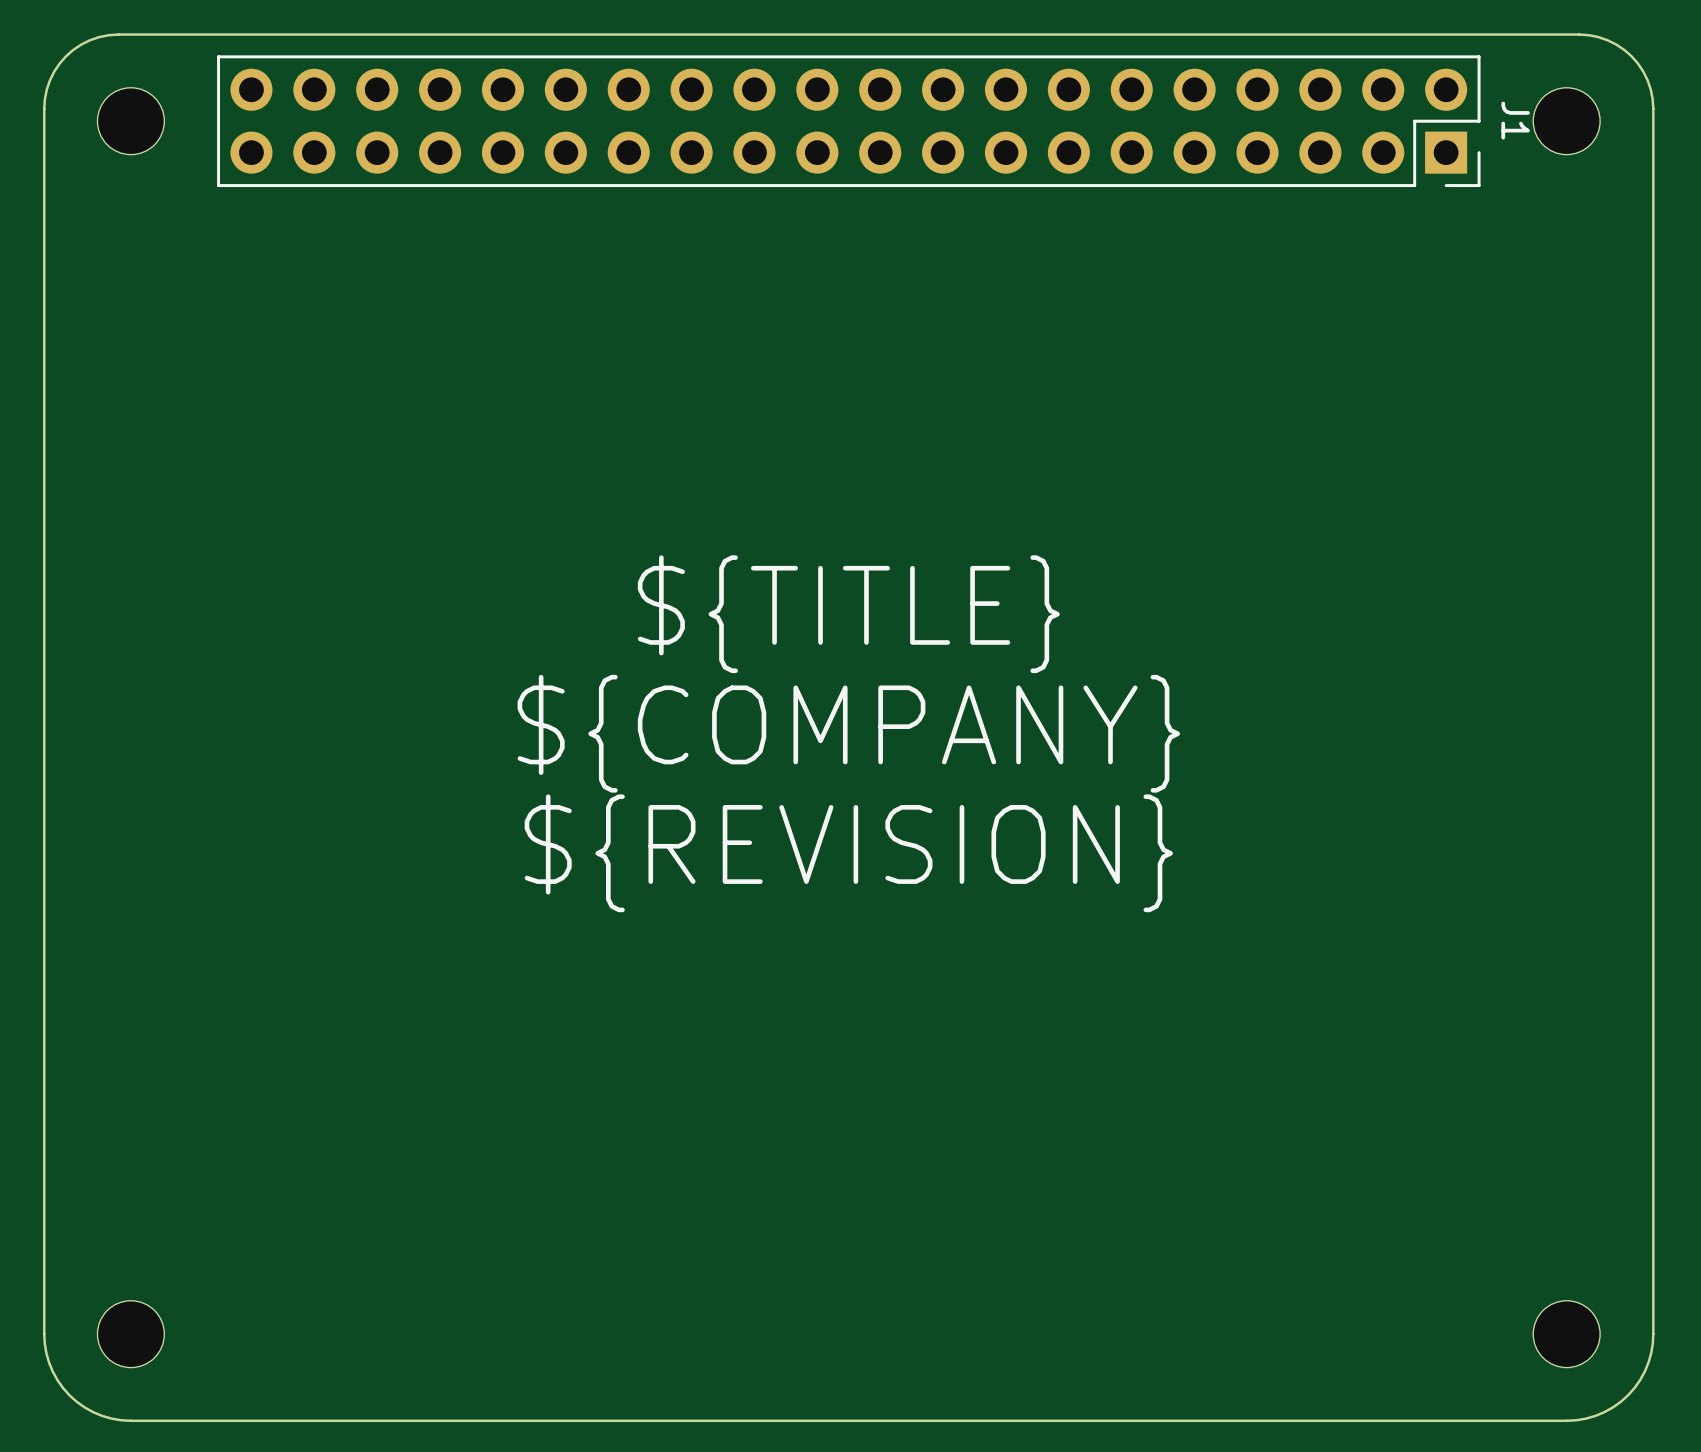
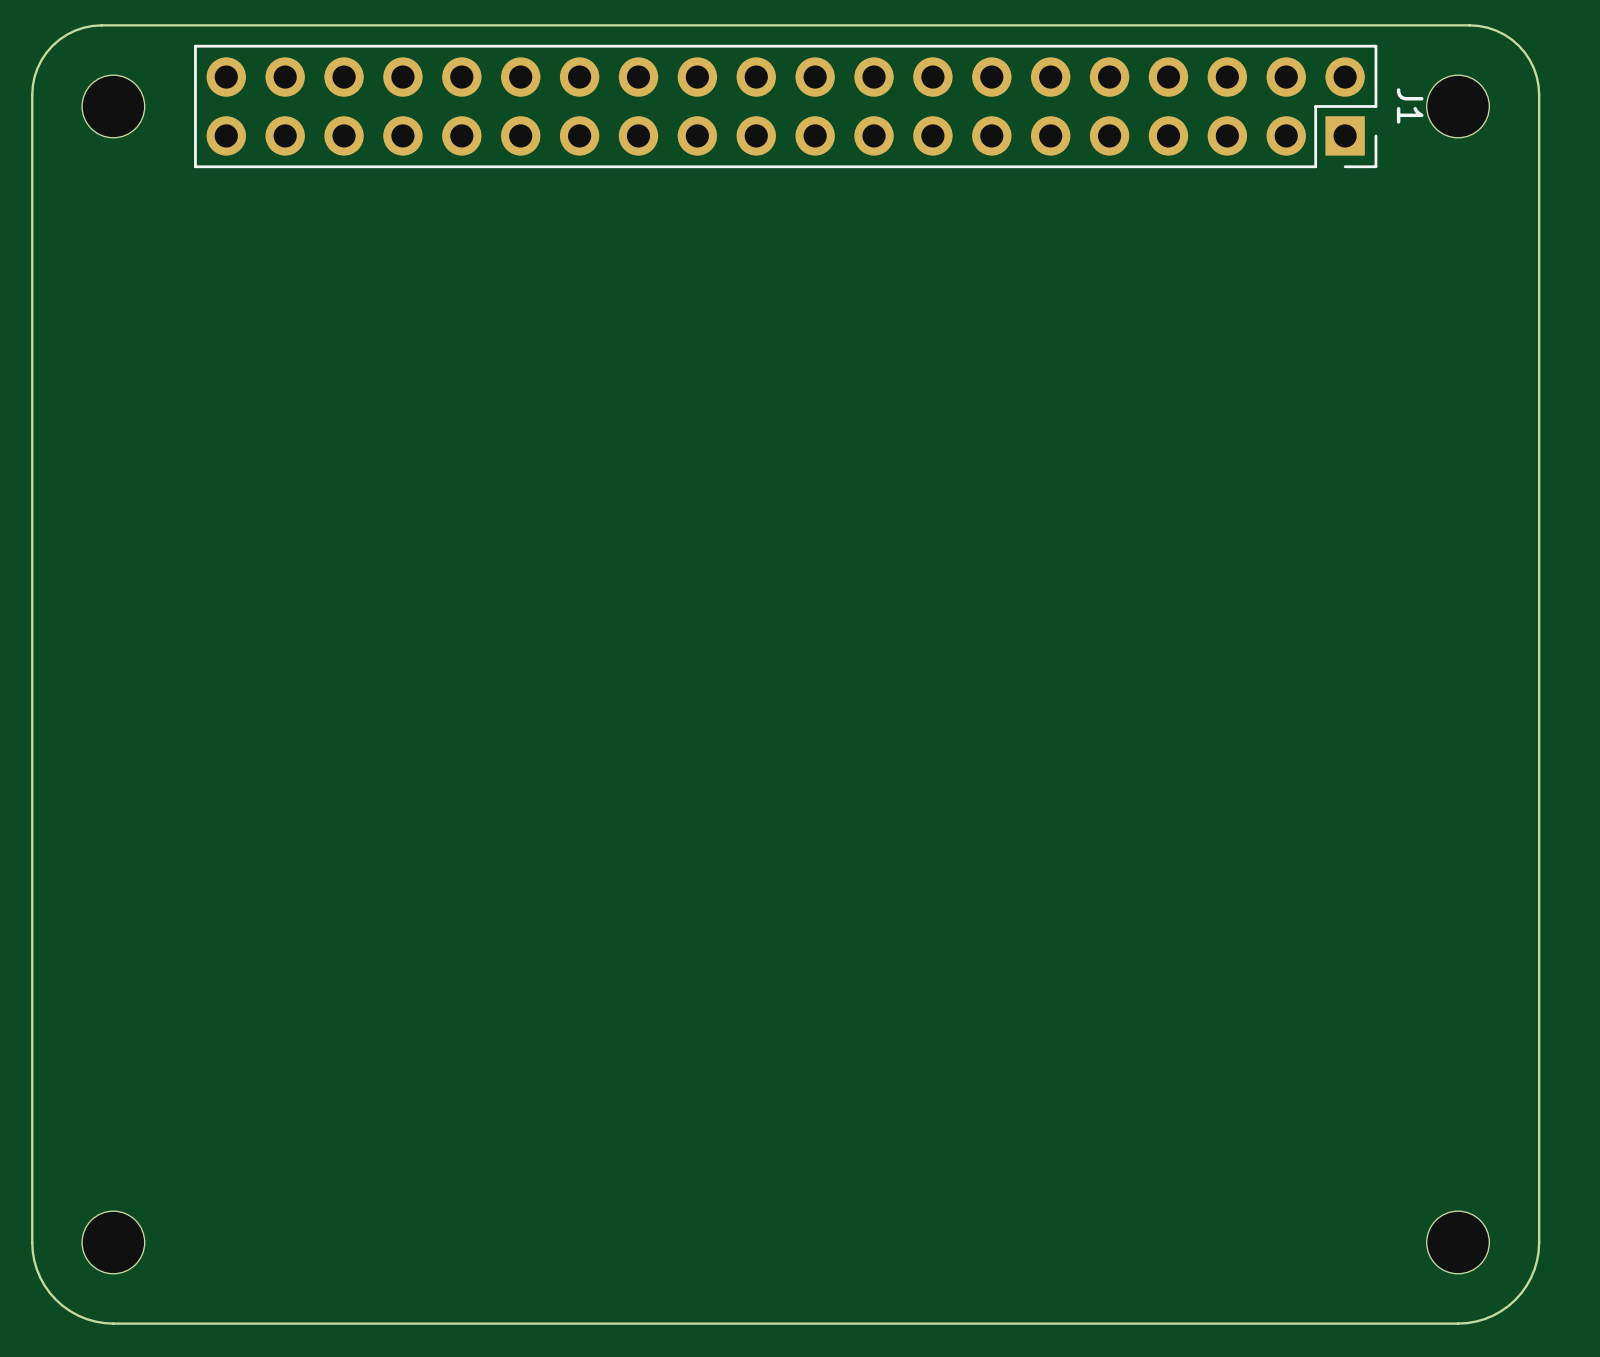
text: ${TITLE} (848, 614) -> none
text: ${COMPANY} (848, 733) -> none
text: ${REVISION} (848, 853) -> none

